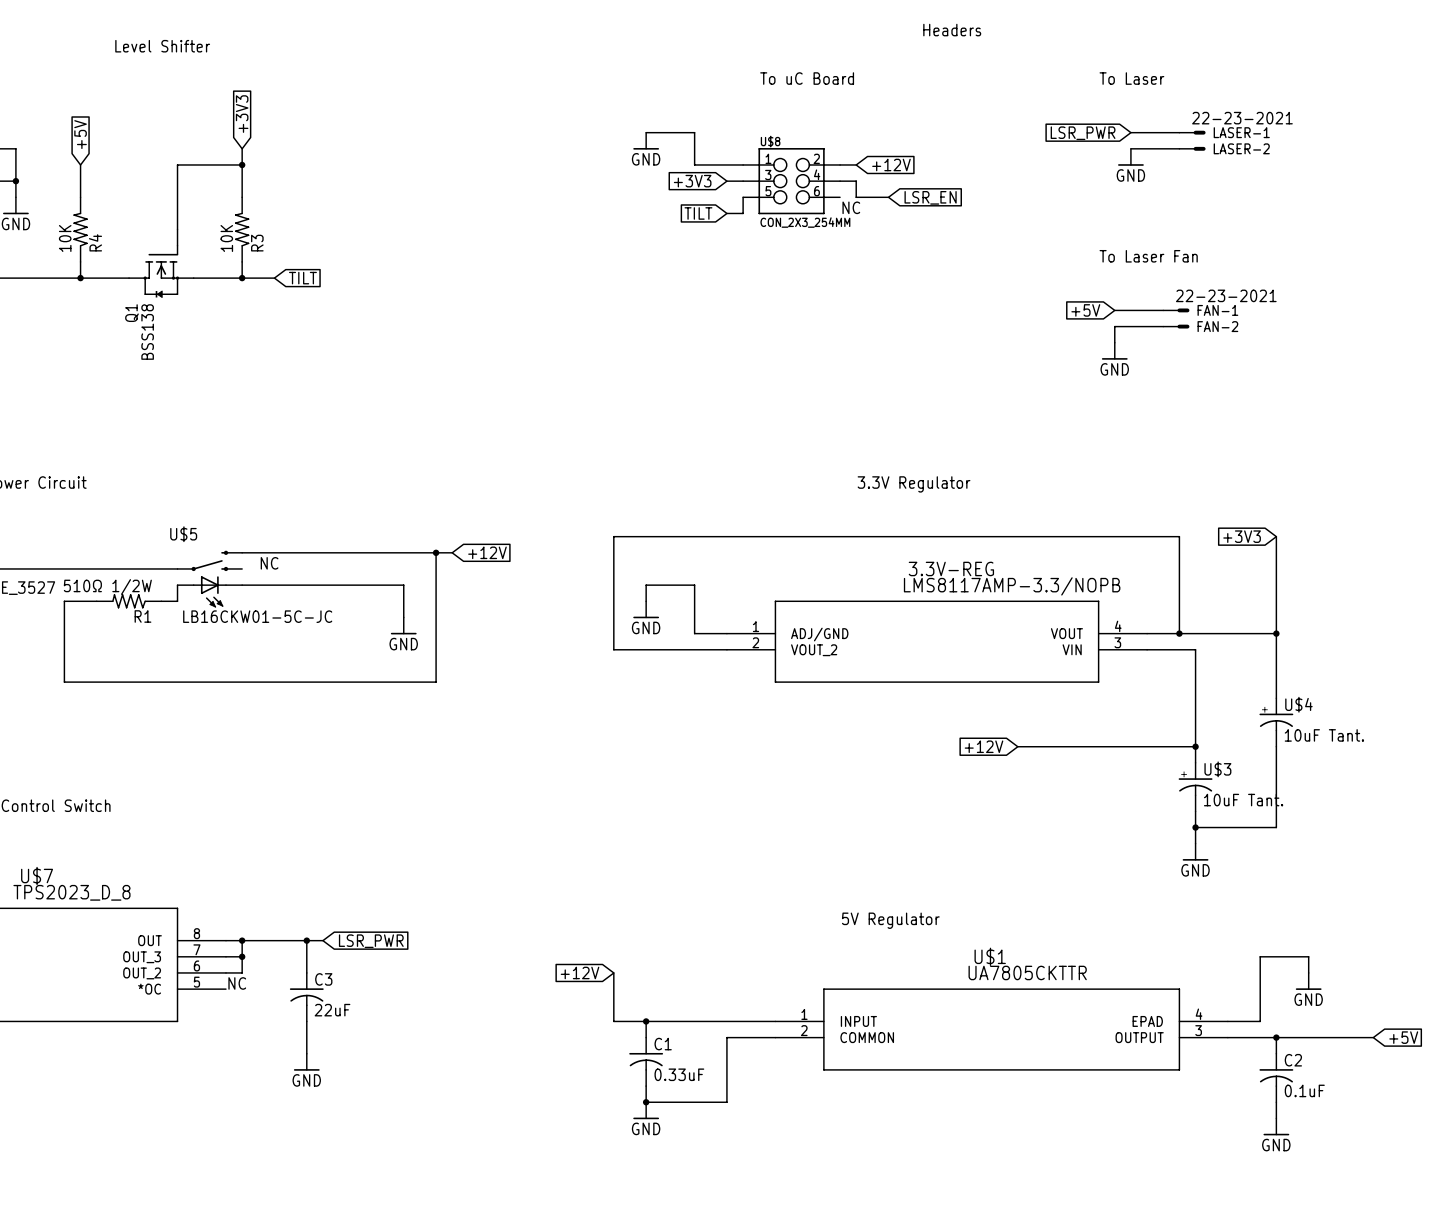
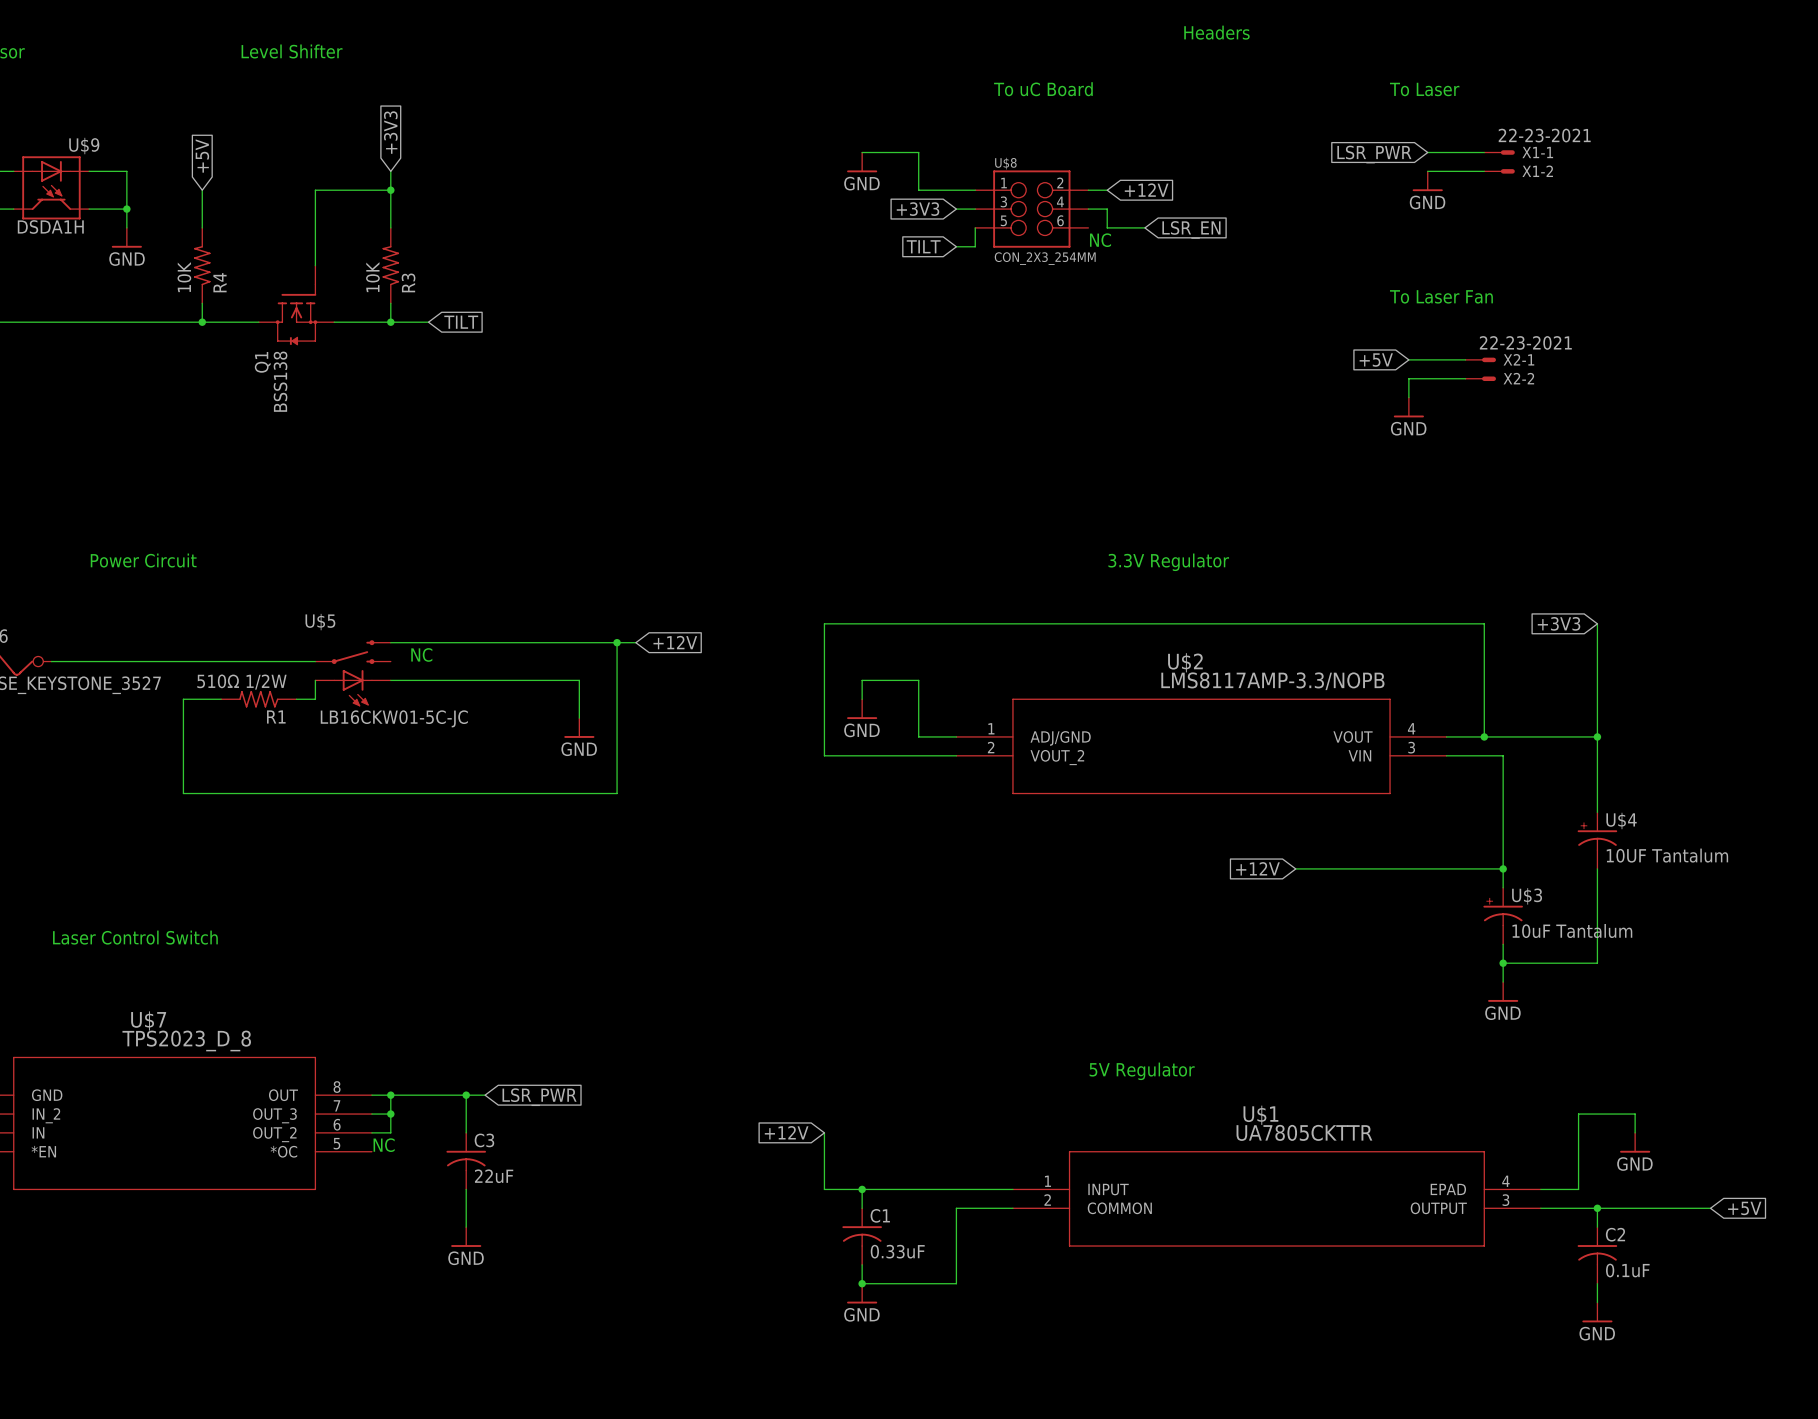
LASER-1 name: LASER-1 (1241, 132) -> X1-1 (1537, 152)
LASER-2 name: LASER-2 (1241, 148) -> X1-2 (1537, 171)
FAN-1 name: FAN-1 (1217, 310) -> X2-1 (1518, 359)
FAN-2 name: FAN-2 (1217, 326) -> X2-2 (1518, 378)
3.3V-REG name: 3.3V-REG (951, 568) -> U$2 (1185, 662)
U$4 value: 10uF Tant. (1324, 735) -> 10UF Tantalum (1667, 855)
U$3 value: 10uF Tant. (1243, 800) -> 10uF Tantalum (1572, 931)

